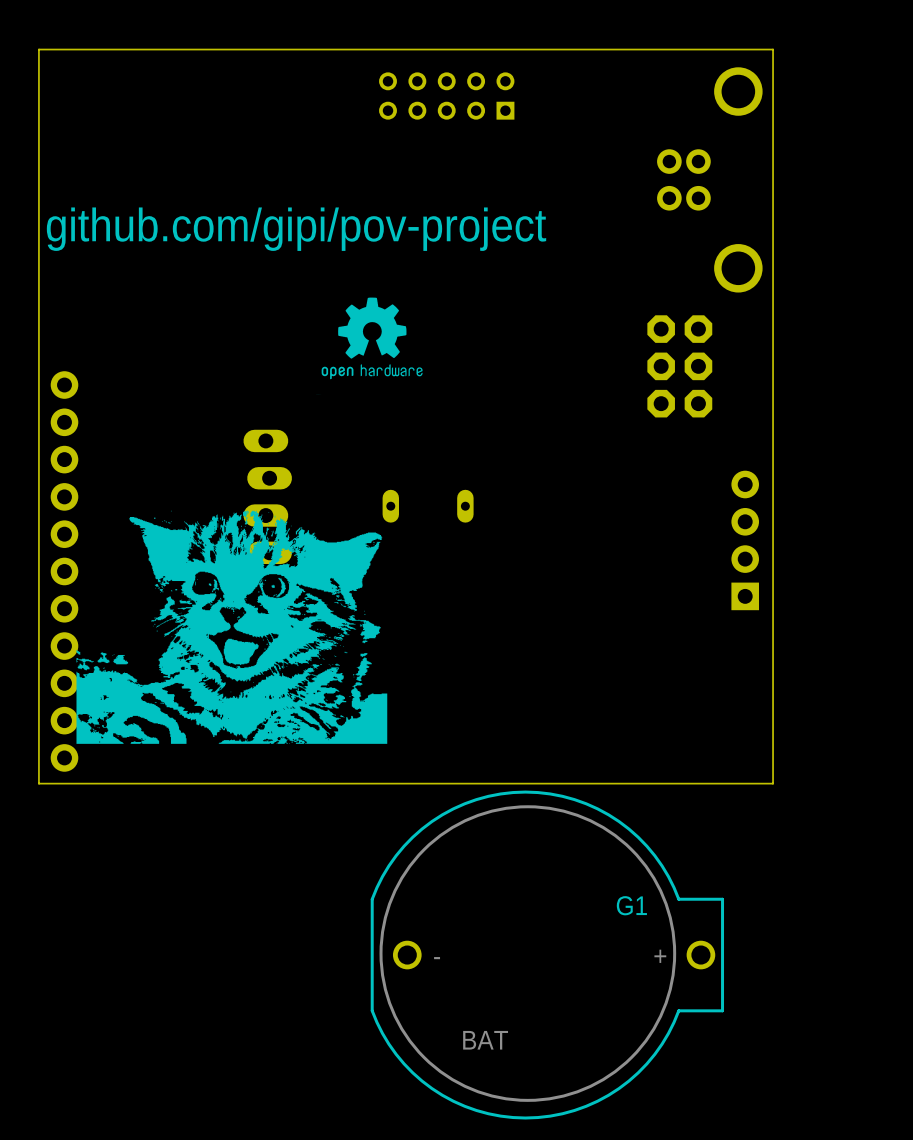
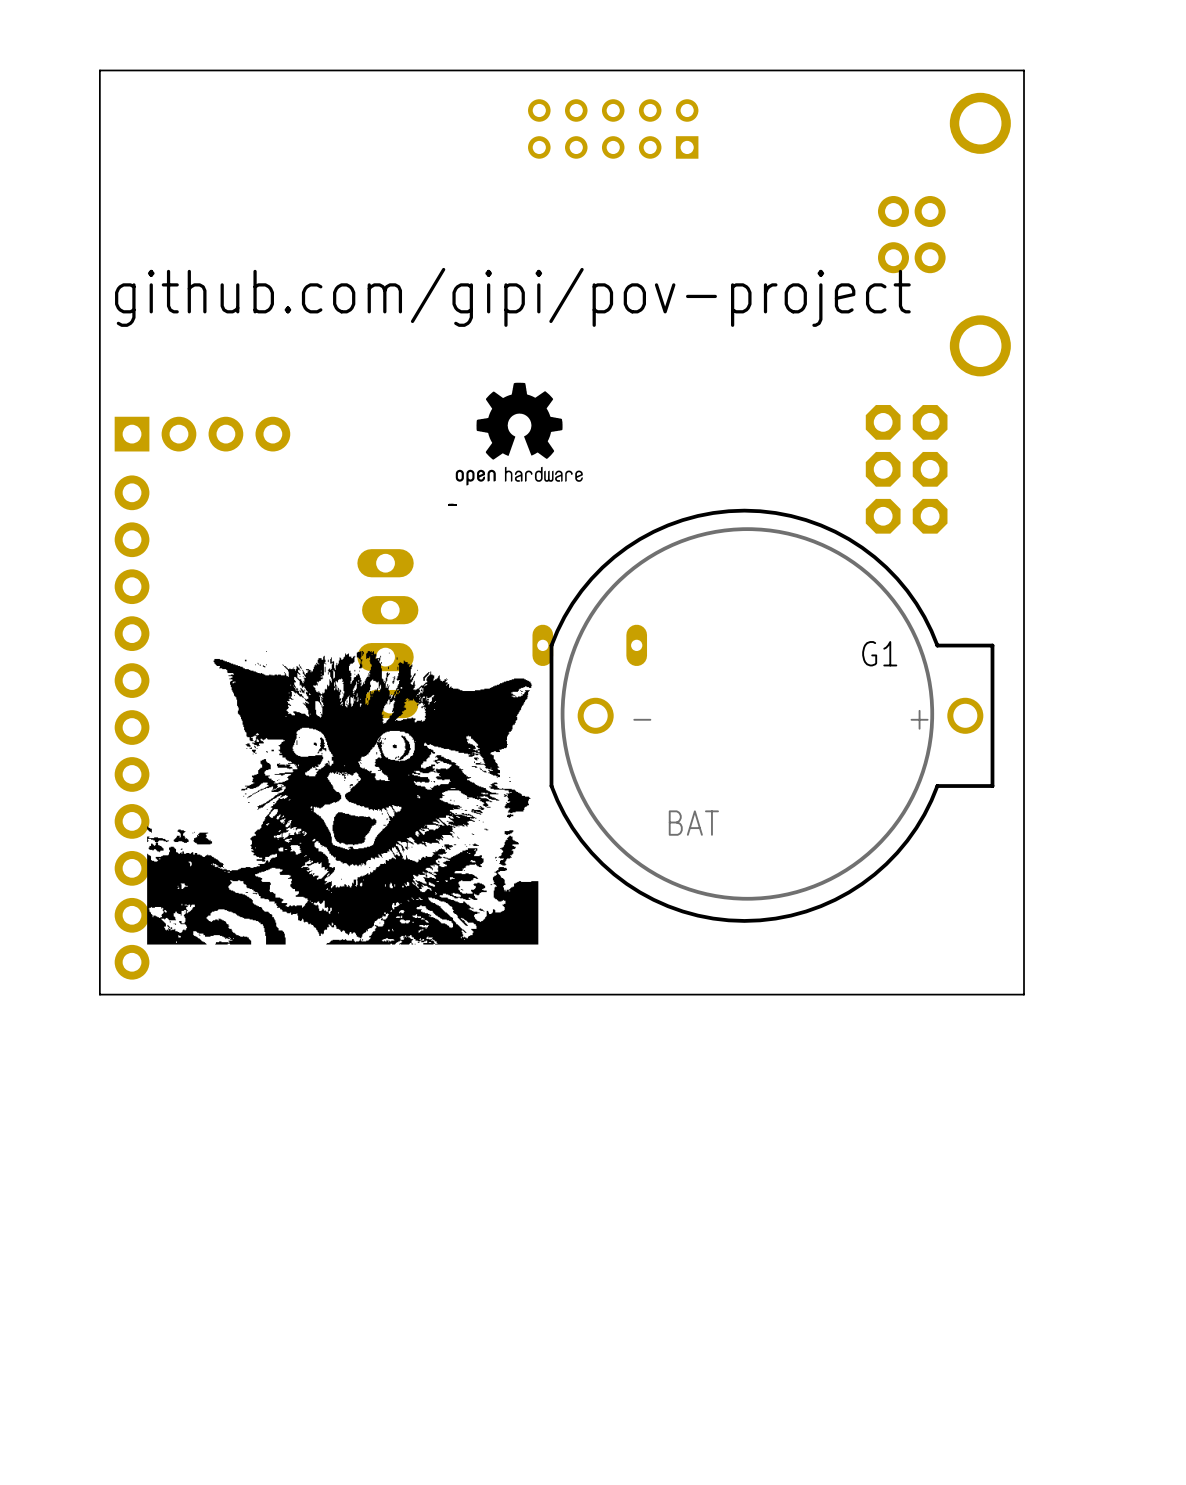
part: none -> (202, 434)
part: (745, 540) -> none
G1 position: (547, 955) -> (771, 715)

